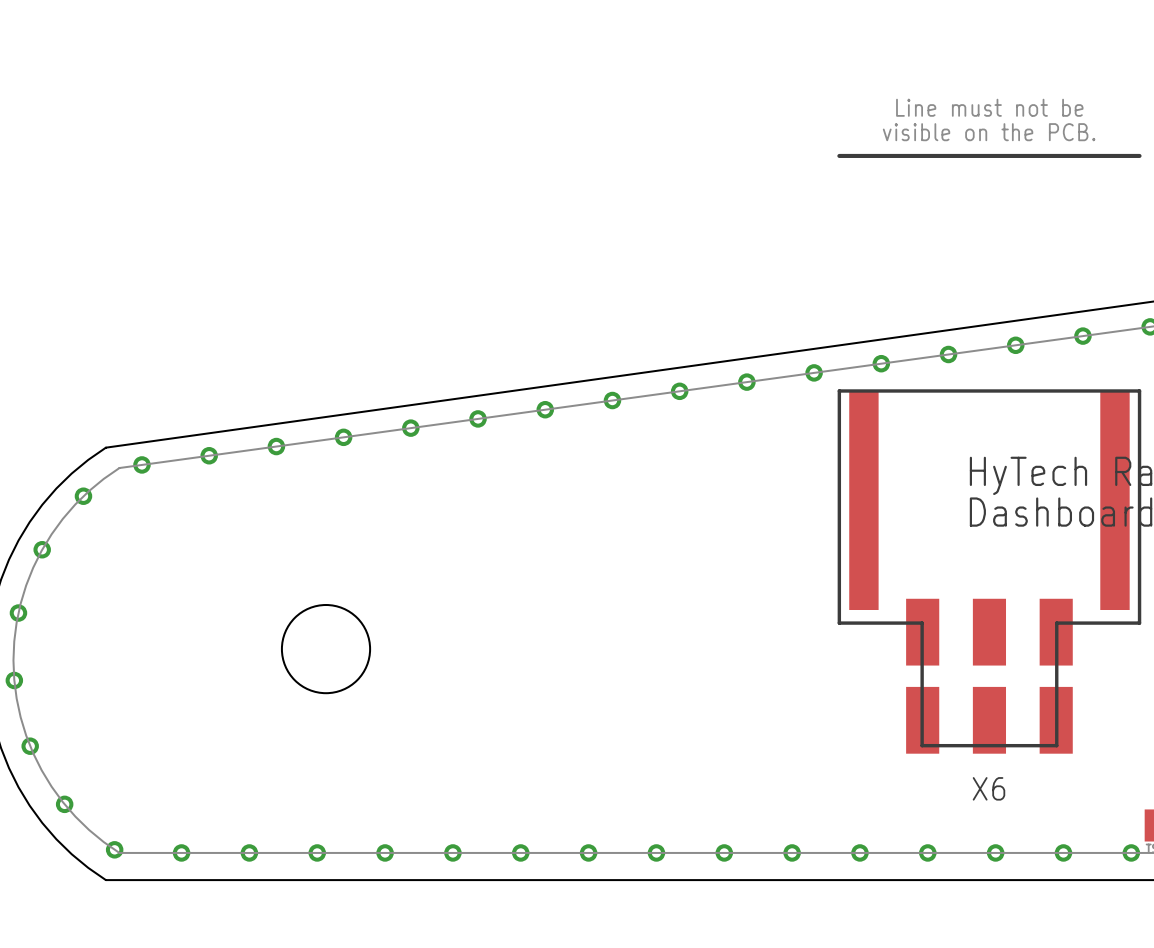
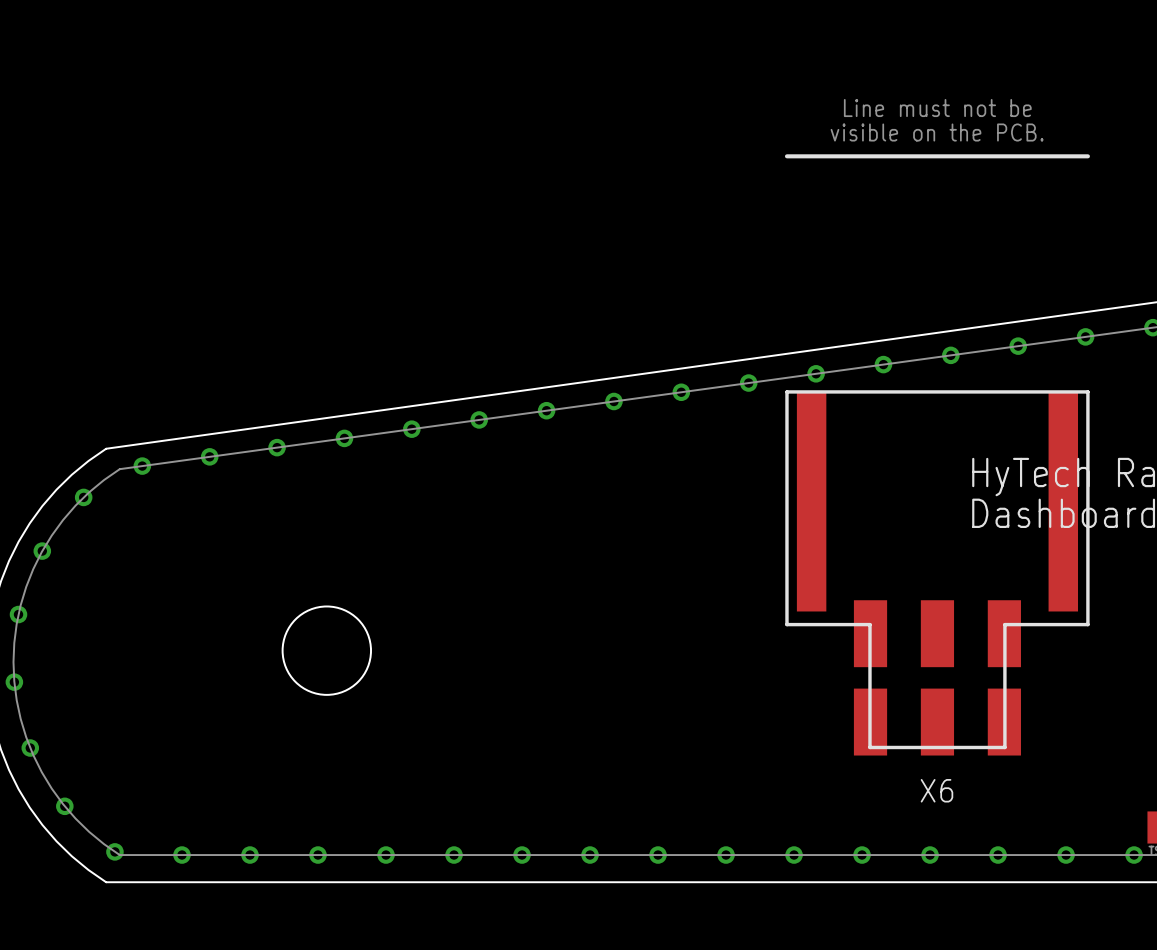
X6 position: (989, 453) -> (937, 454)

